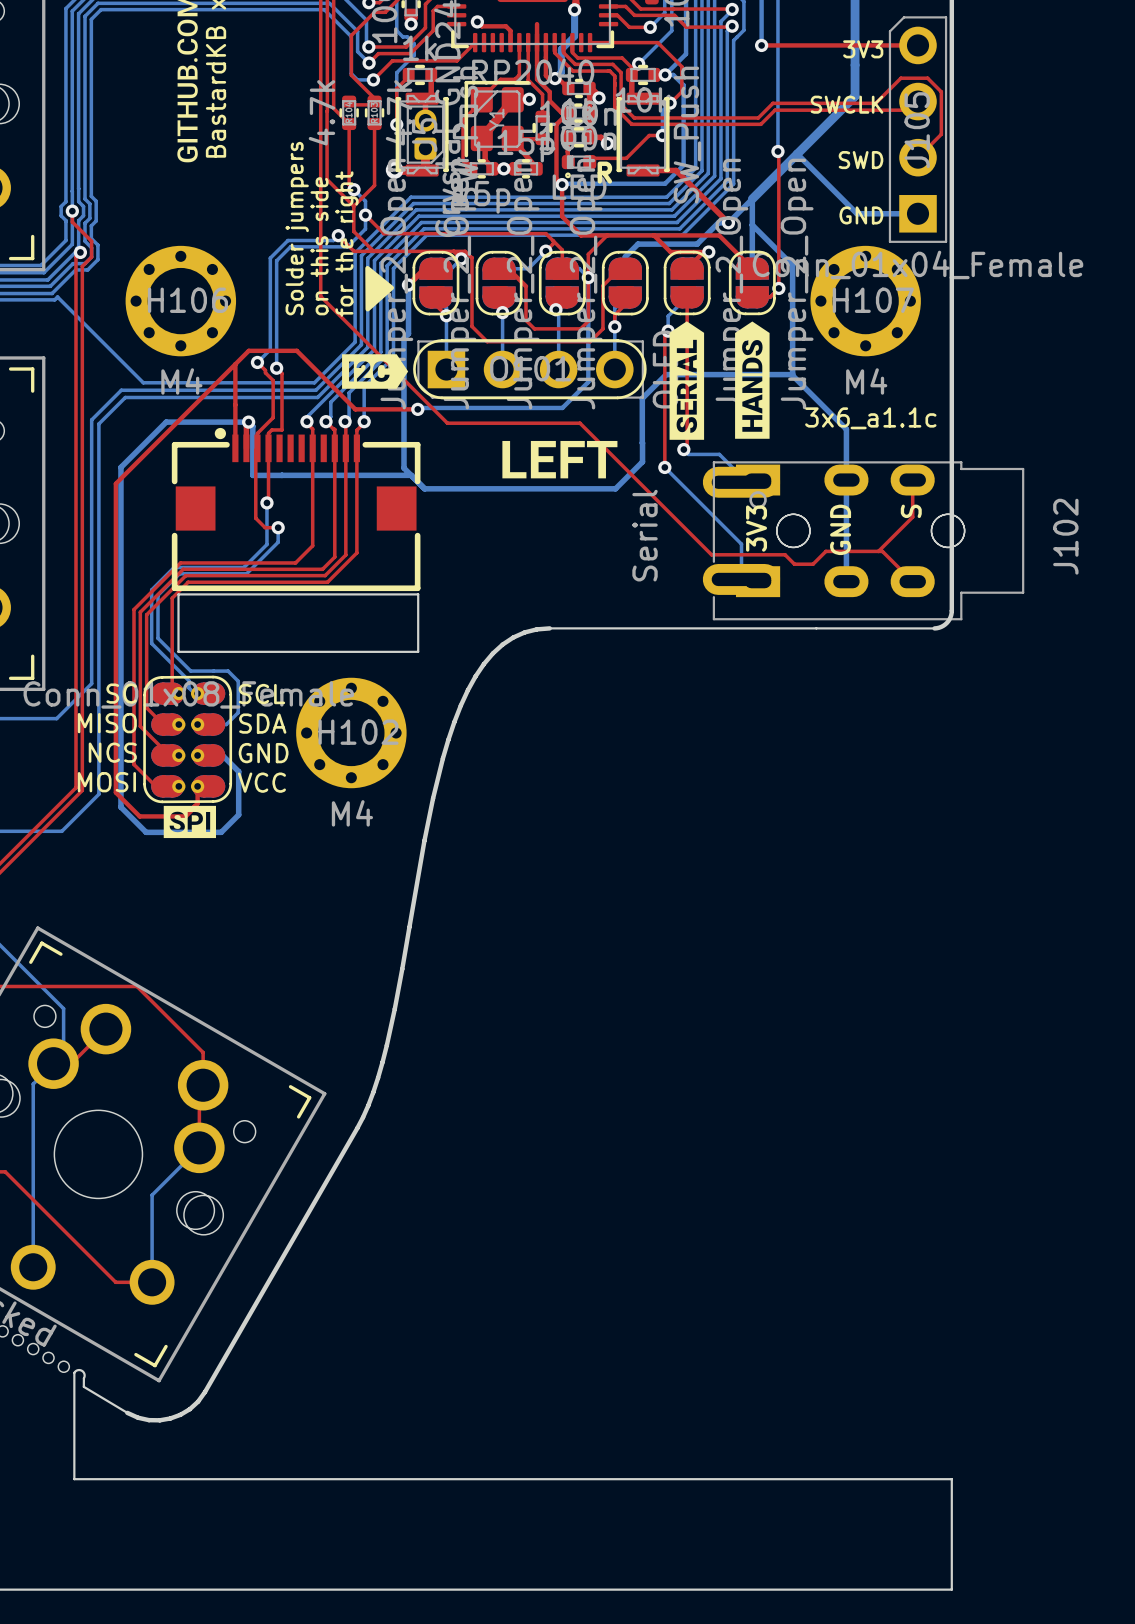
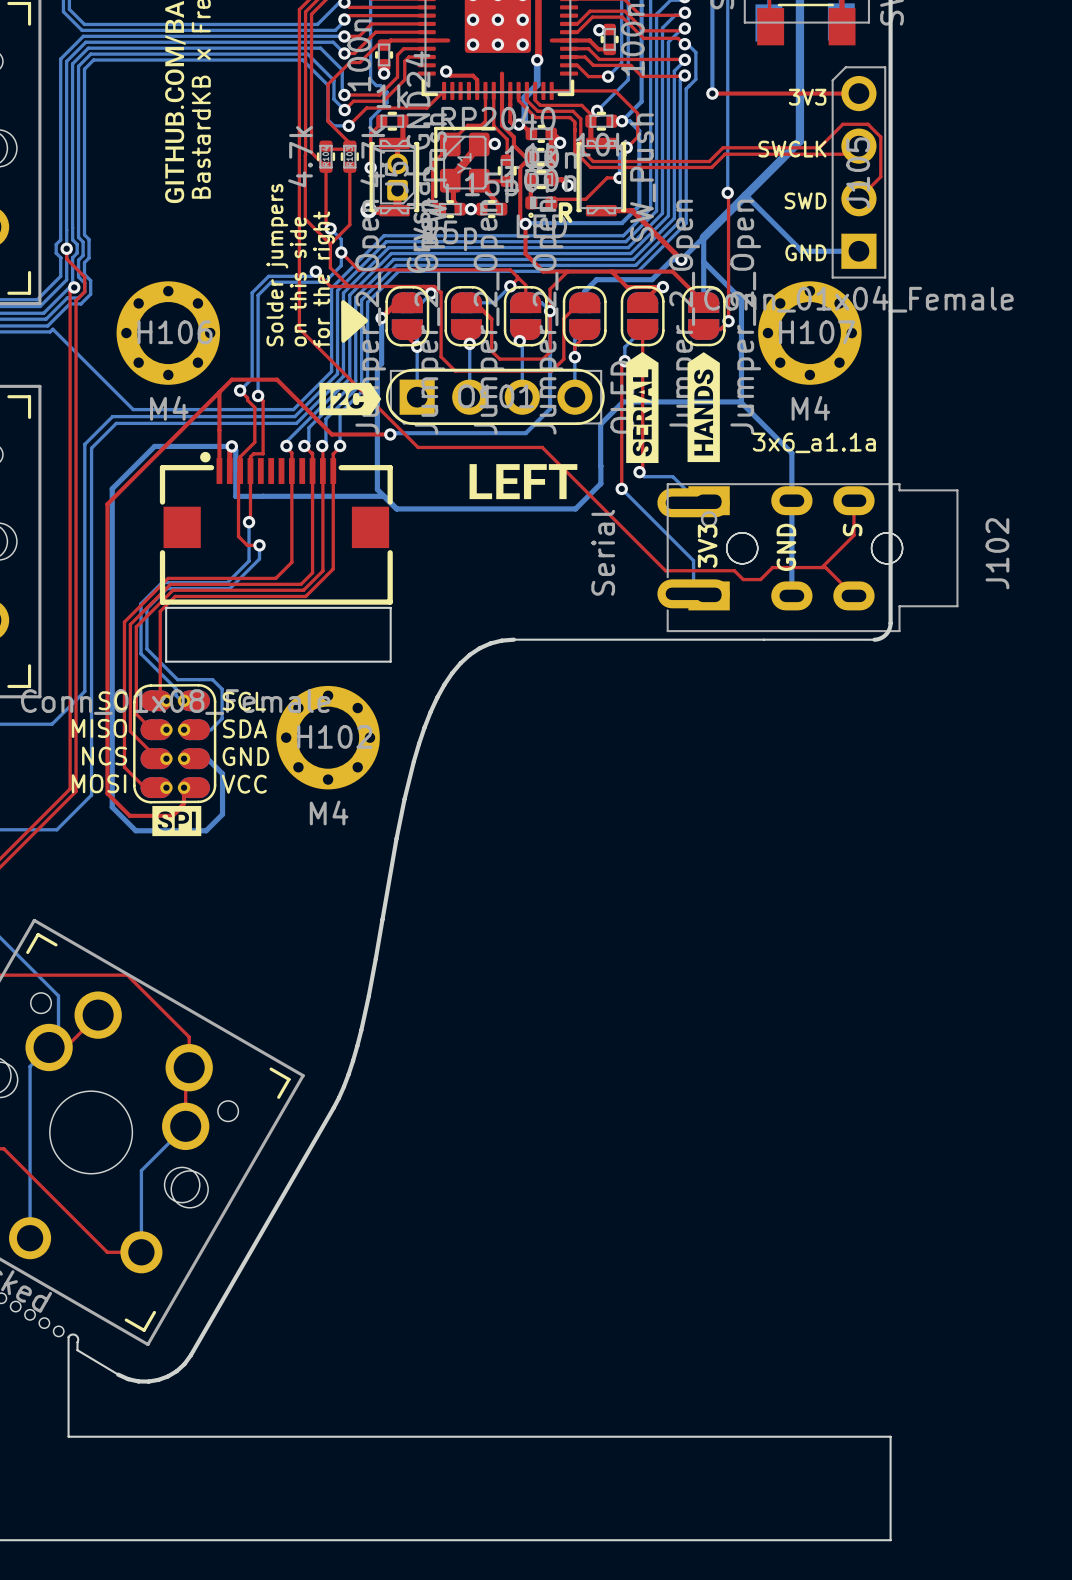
text: 3x6_a1.1c (870, 418) -> 3x6_a1.1a (814, 442)

